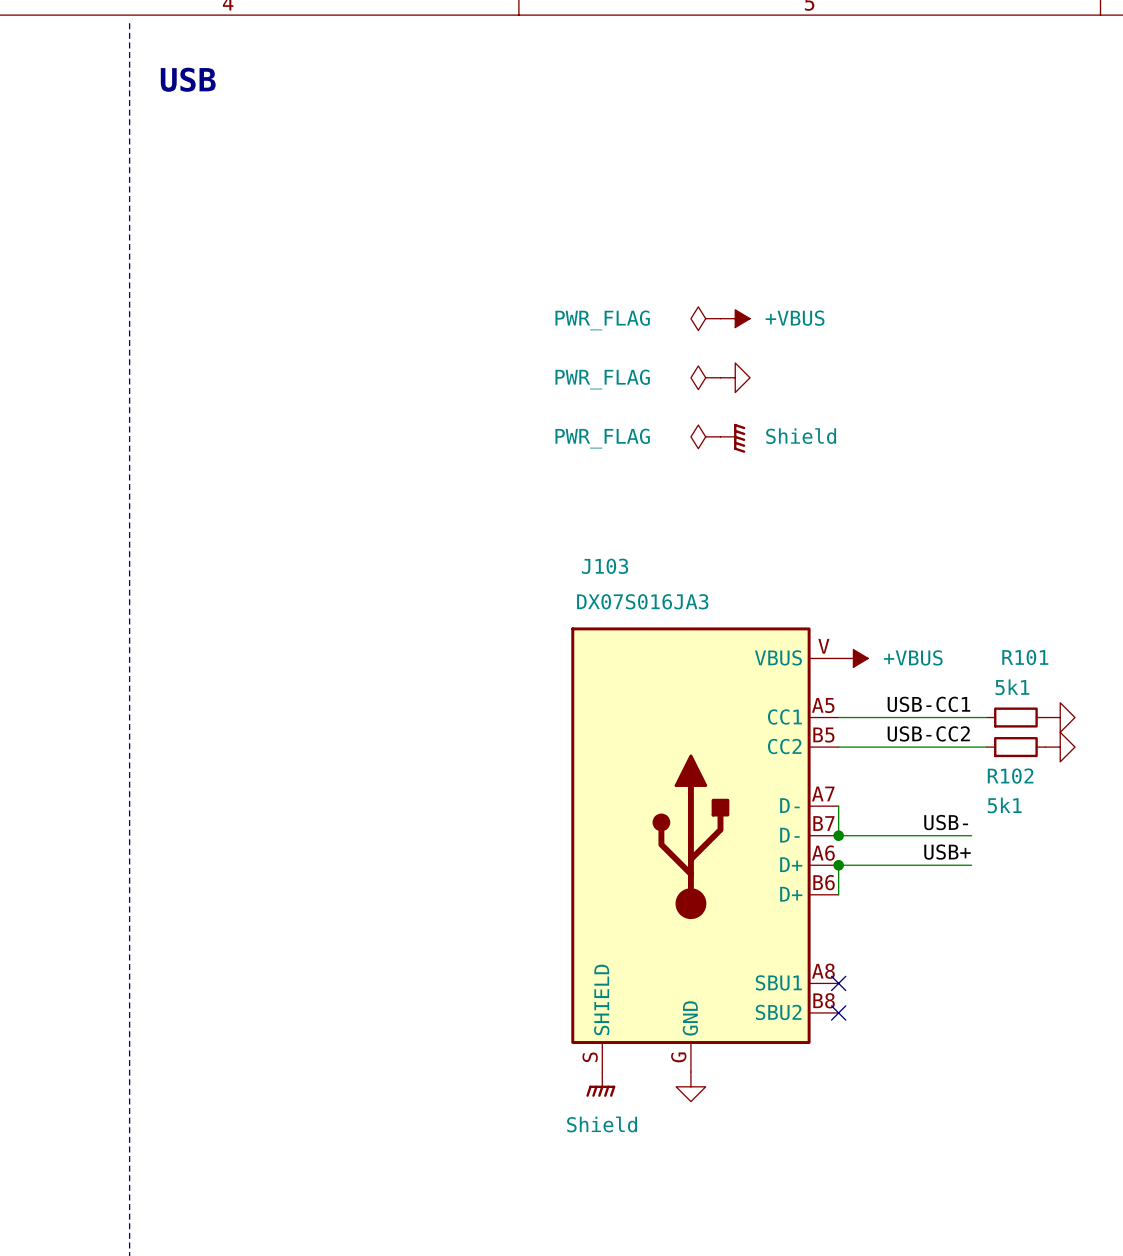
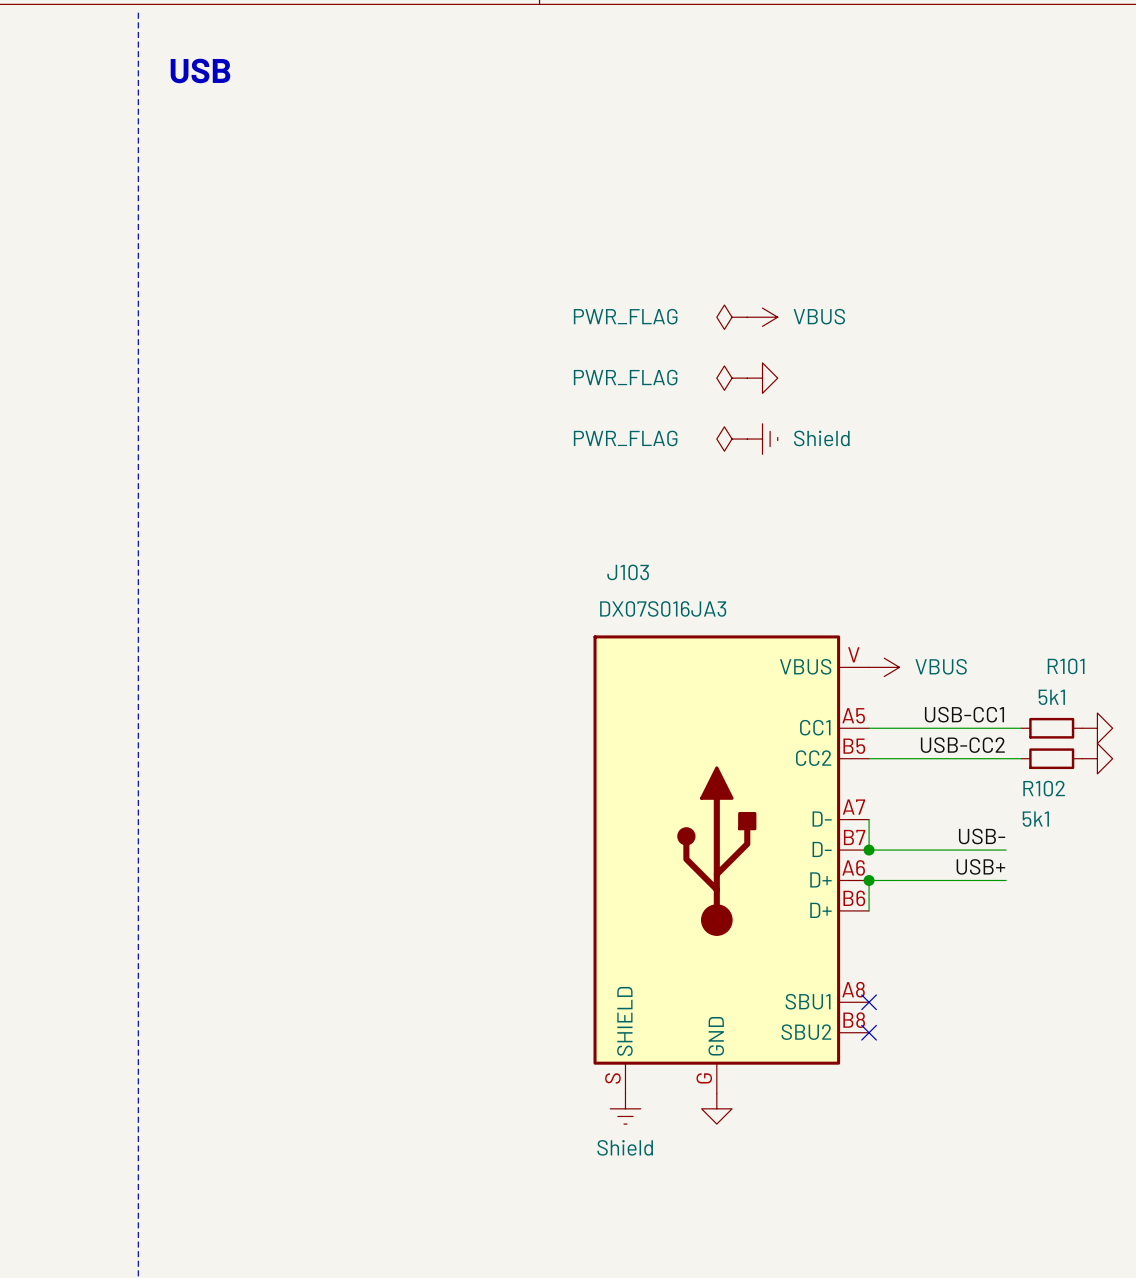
power symbol: +VBUS (735, 318) -> VBUS (762, 317)
power symbol shape: [720, 423, 746, 453] -> [747, 423, 778, 455]
power symbol: +VBUS (853, 658) -> VBUS (884, 667)
power symbol shape: [586, 1072, 616, 1097] -> [610, 1093, 641, 1125]

